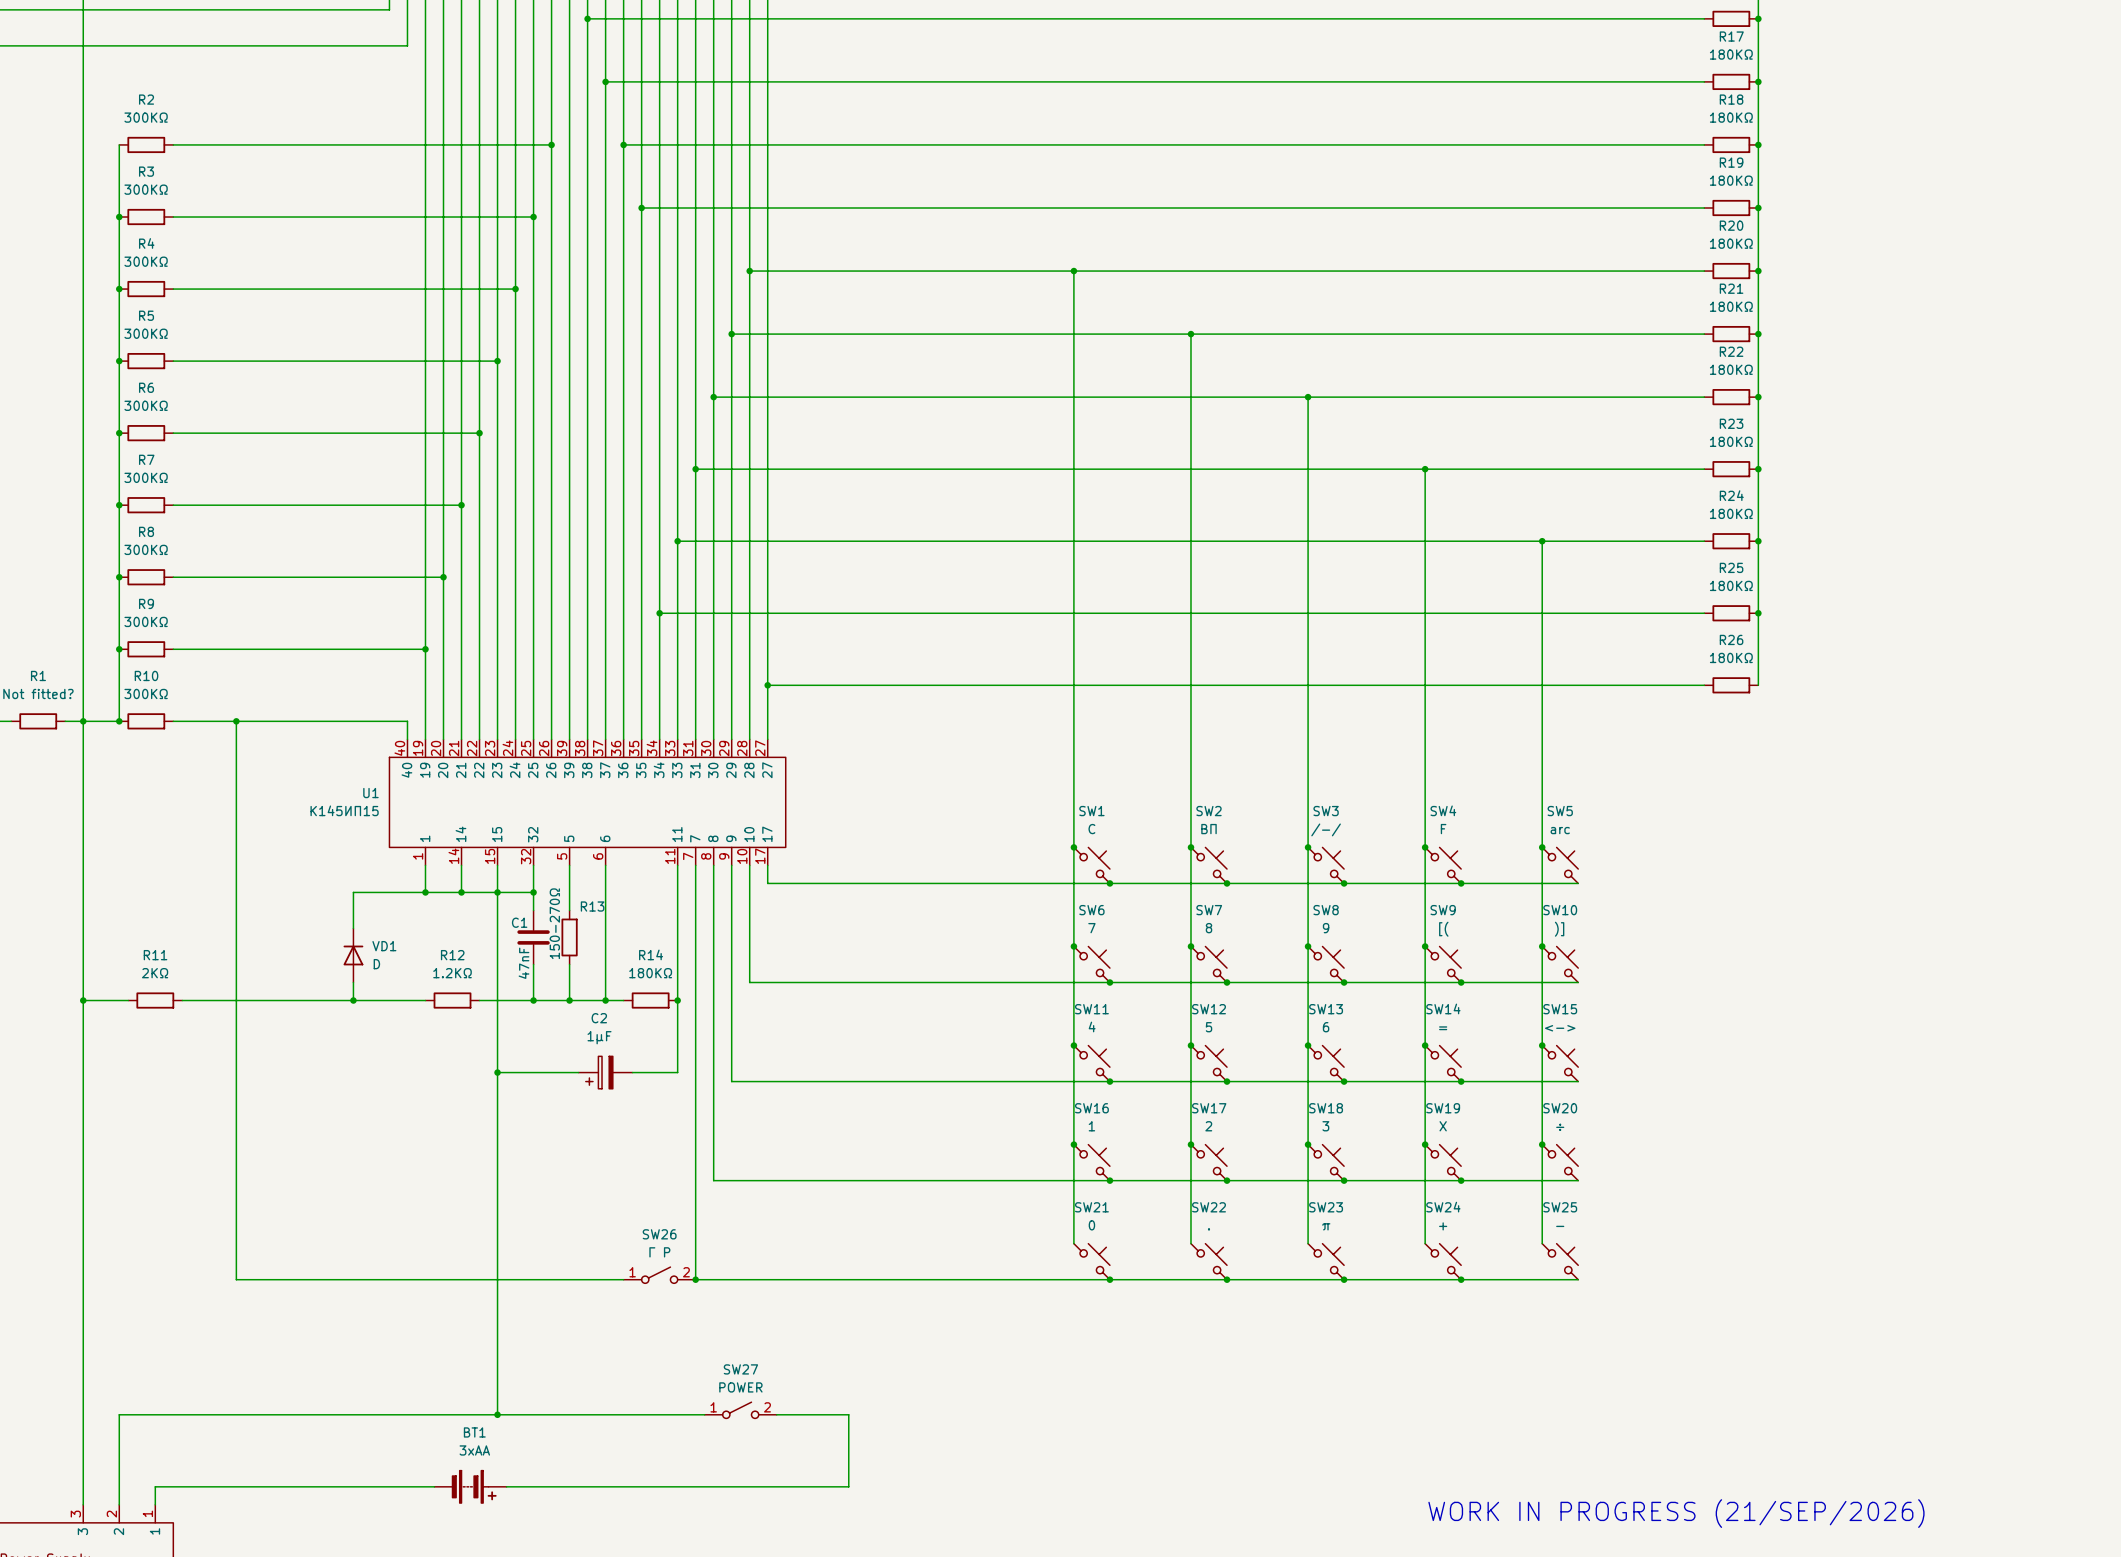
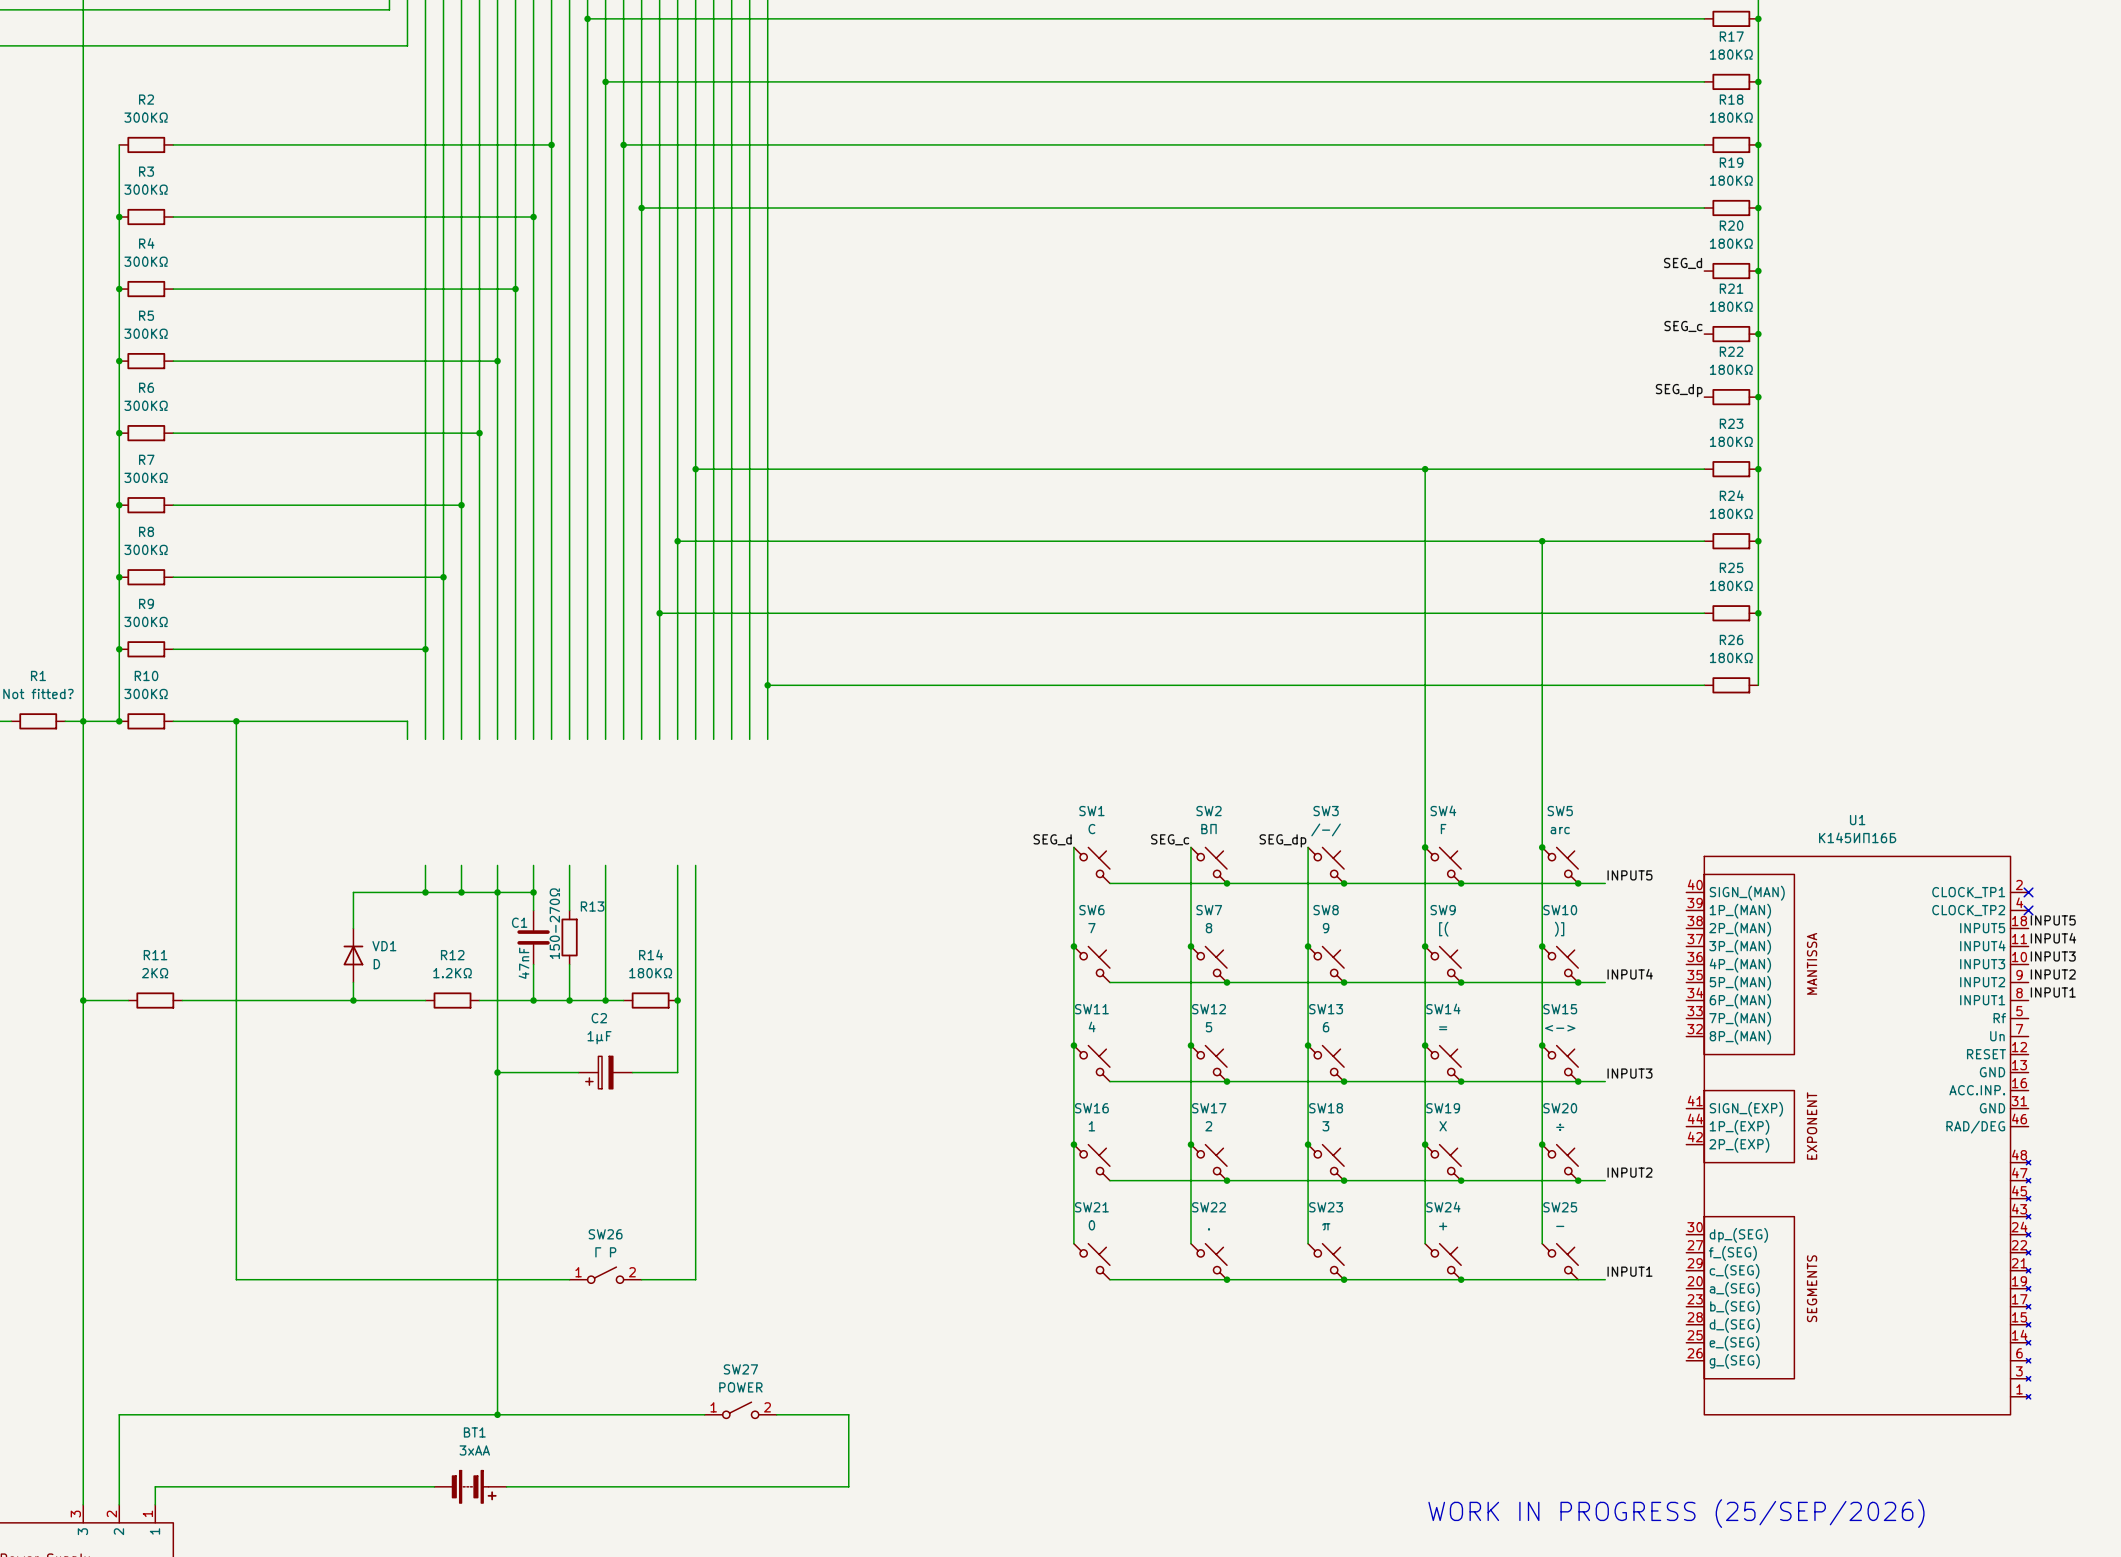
label: none -> SEG_d (1683, 263)
wire: (749, 271) (1704, 271) -> none
junction: (749, 271) -> none
wire: (1073, 271) (1073, 847) -> none
junction: (1073, 271) -> none
label: none -> SEG_c (1683, 326)
wire: (731, 334) (1704, 334) -> none
junction: (731, 334) -> none
wire: (1190, 334) (1190, 847) -> none
junction: (1190, 334) -> none
label: none -> SEG_dp (1679, 390)
wire: (713, 397) (1704, 397) -> none
junction: (713, 397) -> none
wire: (1308, 397) (1308, 847) -> none
junction: (1308, 397) -> none
U1 symbol: [389, 739, 786, 866] -> [1686, 856, 2031, 1415]
U1 name position: U1 (370, 793) -> U1 (1857, 820)
U1 value: К145ИП15 (344, 810) -> К145ИП16Б (1857, 837)
label: none -> SEG_d (1052, 839)
label: none -> SEG_c (1170, 839)
label: none -> SEG_dp (1282, 840)
junction: (1073, 847) -> none
junction: (1190, 847) -> none
junction: (1308, 847) -> none
wire: (713, 865) (713, 1180) (1109, 1180) -> none
wire: (731, 865) (731, 1081) (1109, 1081) -> none
wire: (749, 865) (749, 982) (1109, 982) -> none
wire: (767, 865) (767, 883) (1109, 883) -> none
label: none -> INPUT5 (1629, 875)
junction: (1109, 883) -> none
wire: none -> (1578, 883) (1605, 883)
junction: none -> (1578, 883)
no-connect mark: none -> (2028, 892)
no-connect mark: none -> (2028, 910)
label: none -> INPUT5 (2053, 920)
label: none -> INPUT4 (2053, 938)
label: none -> INPUT3 (2053, 956)
label: none -> INPUT4 (1630, 974)
label: none -> INPUT2 (2053, 974)
junction: (1109, 982) -> none
wire: none -> (1578, 982) (1605, 982)
junction: none -> (1578, 982)
label: none -> INPUT1 (2053, 992)
label: none -> INPUT3 (1629, 1073)
junction: (1109, 1081) -> none
wire: none -> (1578, 1081) (1605, 1081)
junction: none -> (1578, 1081)
label: none -> INPUT2 (1629, 1172)
junction: (1109, 1180) -> none
wire: none -> (1578, 1180) (1605, 1180)
junction: none -> (1578, 1180)
label: none -> INPUT1 (1629, 1271)
SW26 position: (659, 1275) -> (605, 1275)
wire: (569, 1279) (623, 1279) -> none
wire: (695, 1279) (1109, 1279) -> (695, 1279) (641, 1279)
junction: (695, 1279) -> none
junction: (1109, 1279) -> none
wire: none -> (1578, 1279) (1605, 1279)
text: WORK IN PROGRESS (21/SEP/2026) (1676, 1513) -> WORK IN PROGRESS (25/SEP/2026) (1676, 1513)

